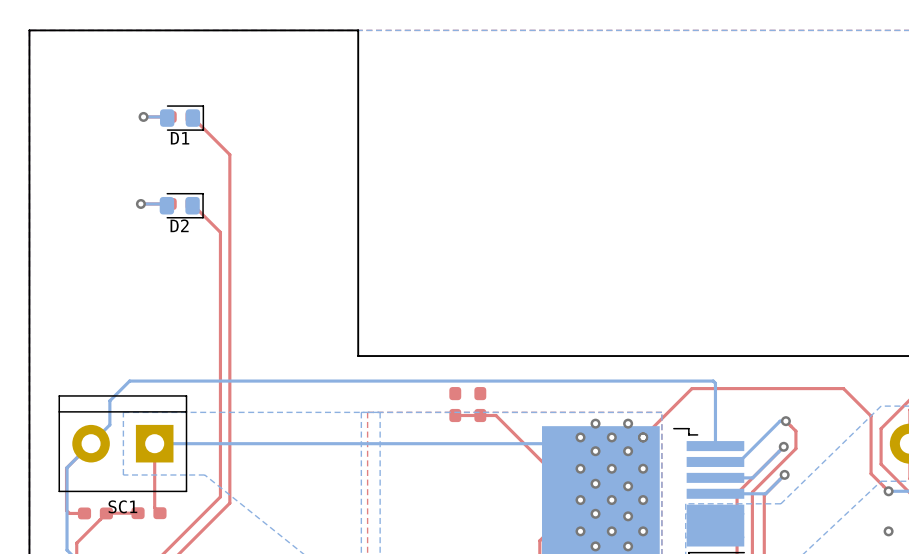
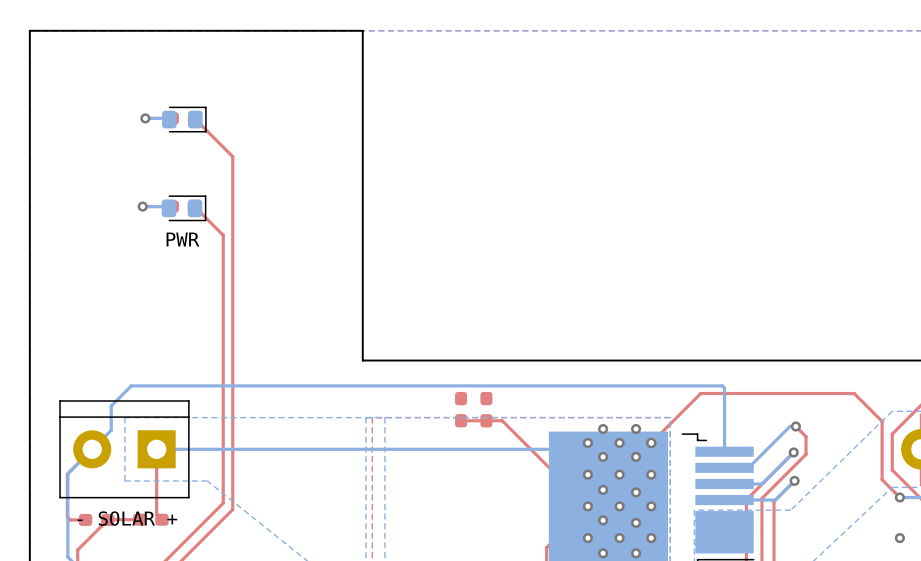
D1 name: D1 (180, 138) -> none
D2 name: D2 (179, 225) -> none
text: none -> PWR (182, 239)
SC1 name: SC1 (122, 506) -> none
text: none -> - SOLAR + (127, 518)

